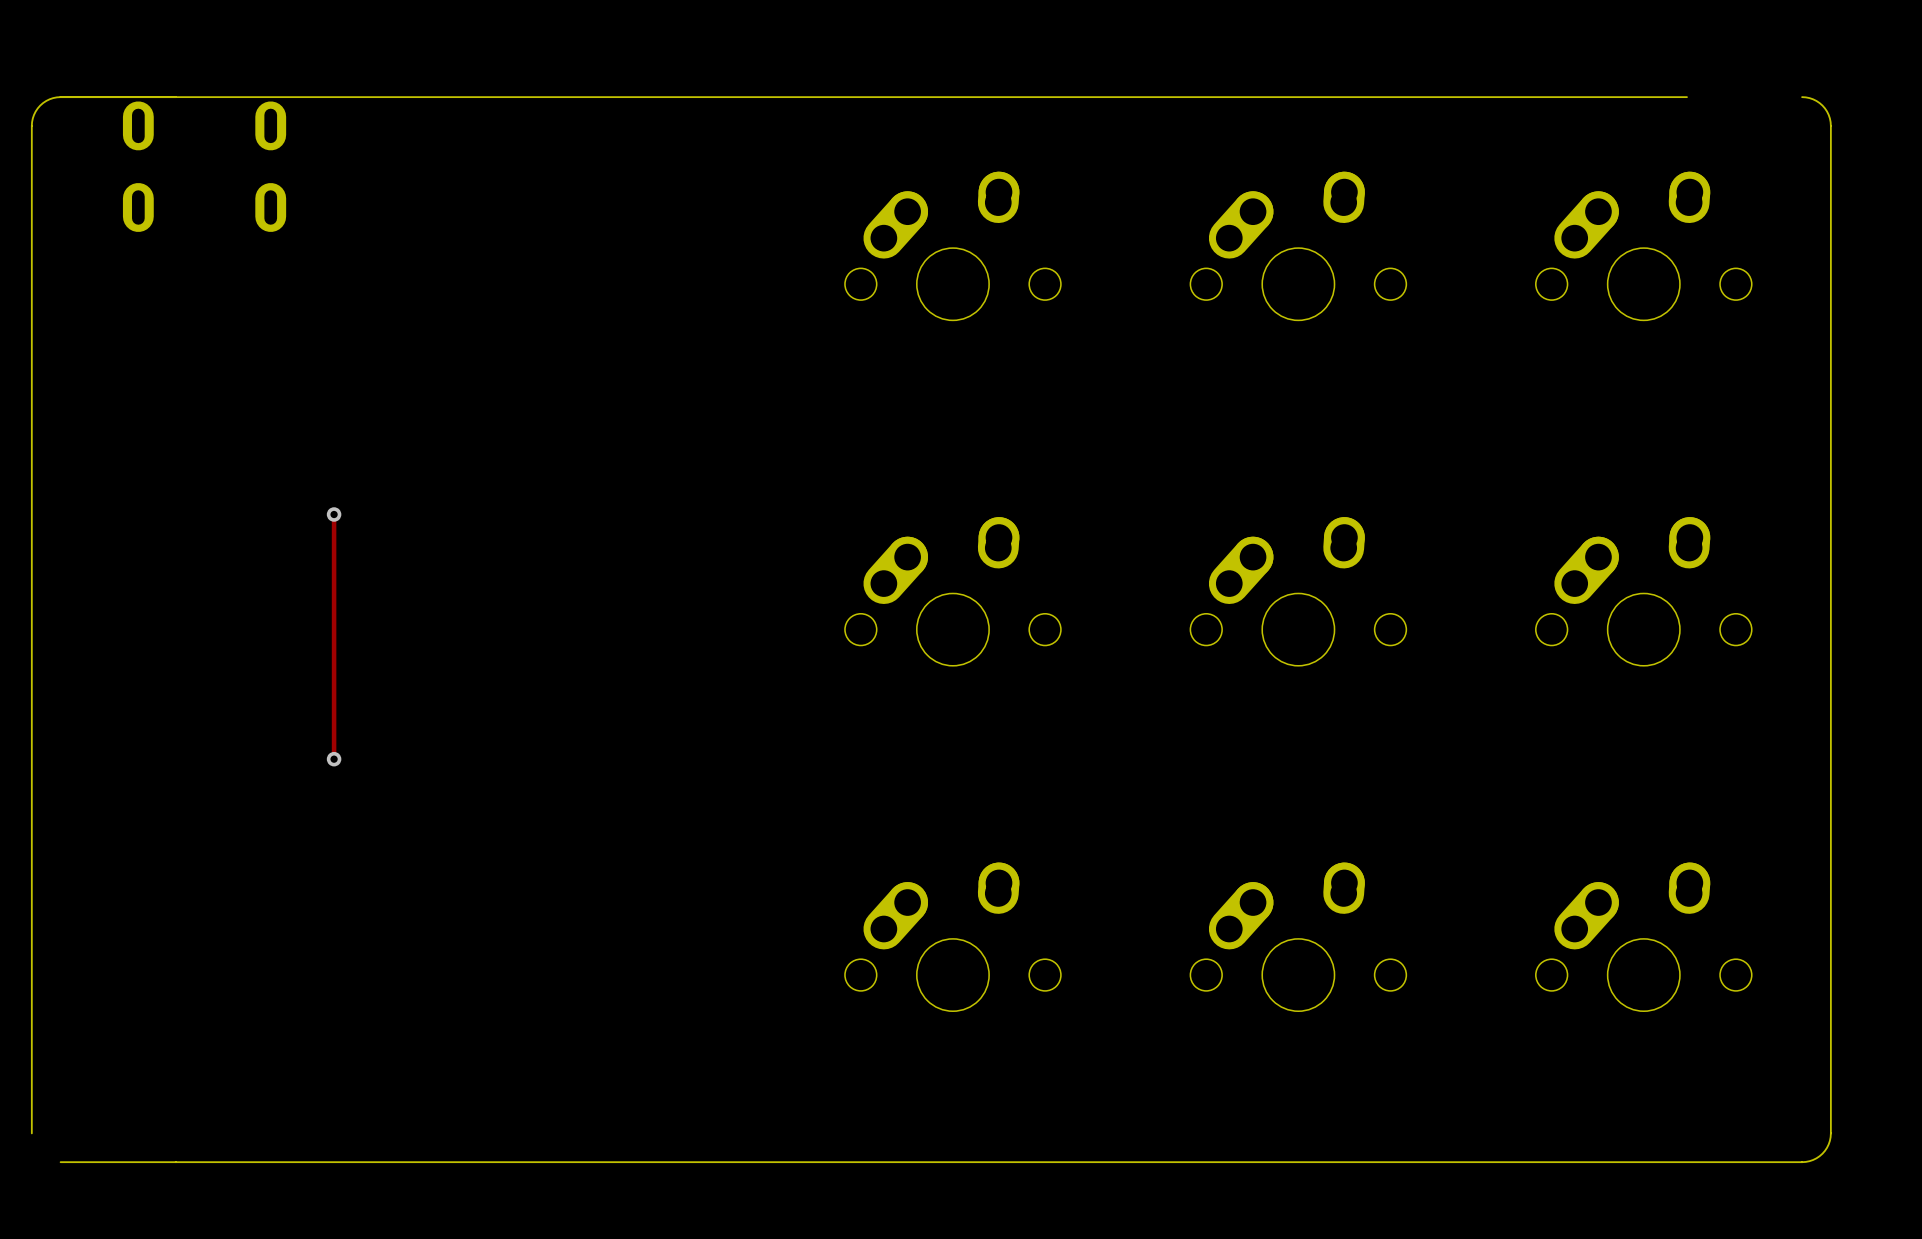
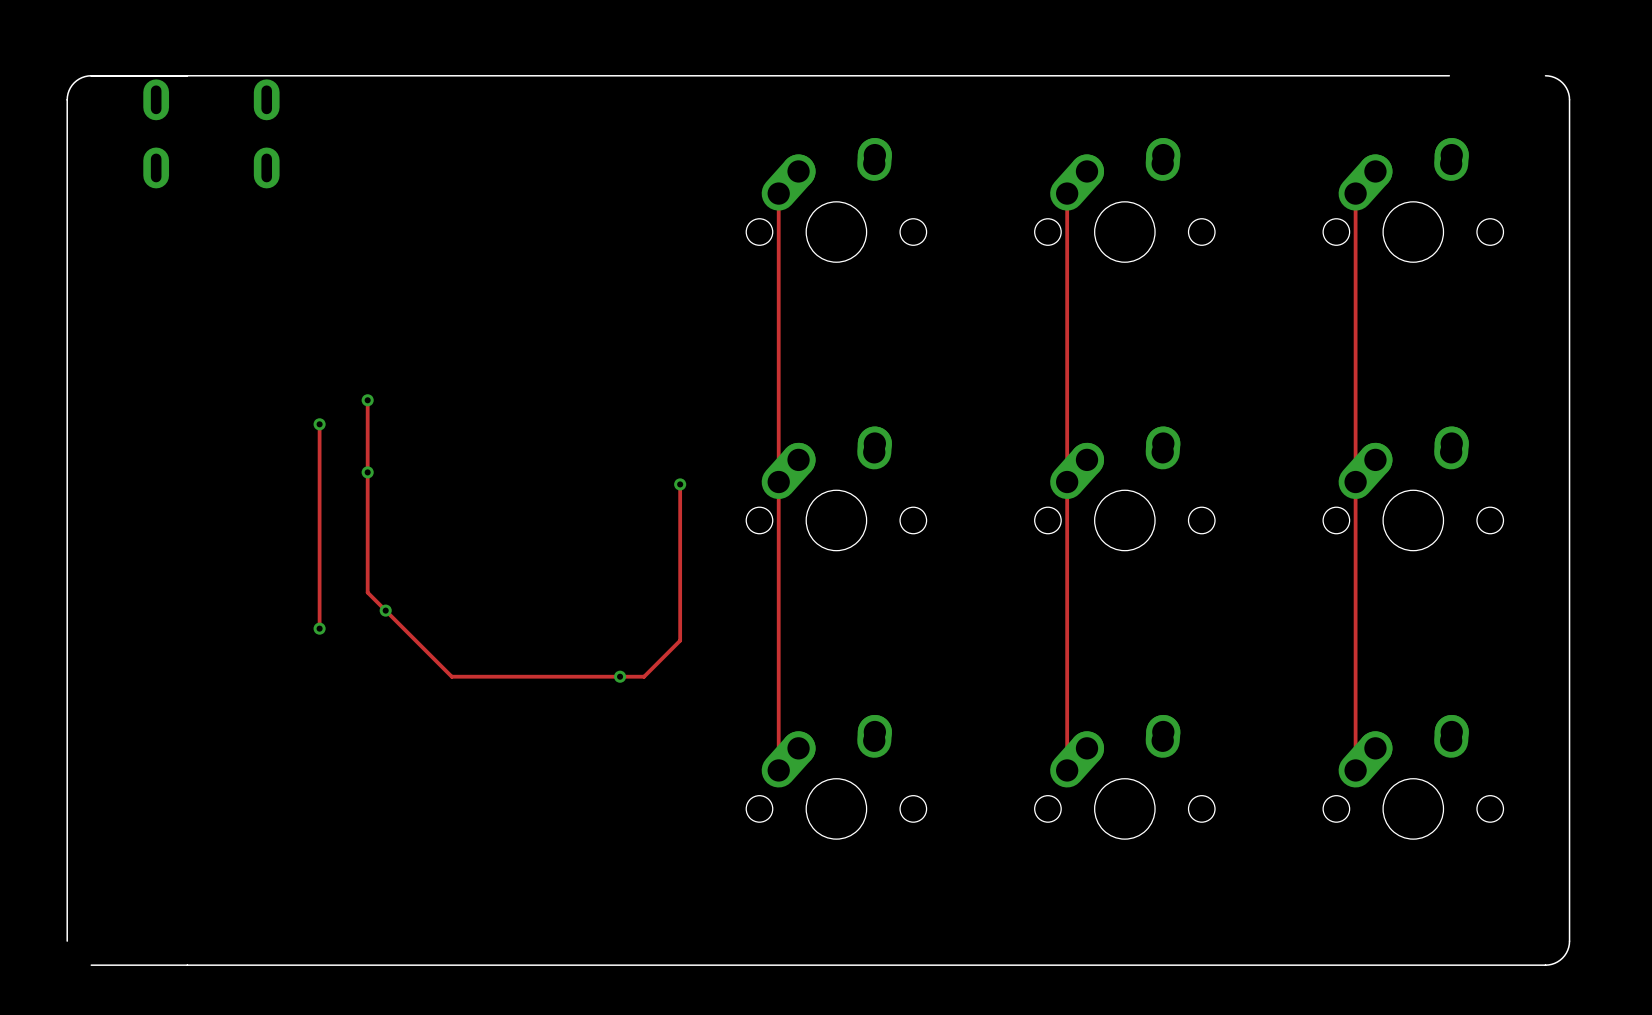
track: none -> (778, 193) (778, 770)
track: none -> (1067, 193) (1067, 770)
track: none -> (1355, 193) (1355, 770)
track: none -> (367, 400) (367, 592) (451, 676) (644, 676) (680, 640) (680, 484)
via: none -> (367, 400)
via: none -> (367, 472)
via: none -> (680, 484)
via: none -> (385, 610)
via: none -> (620, 676)

